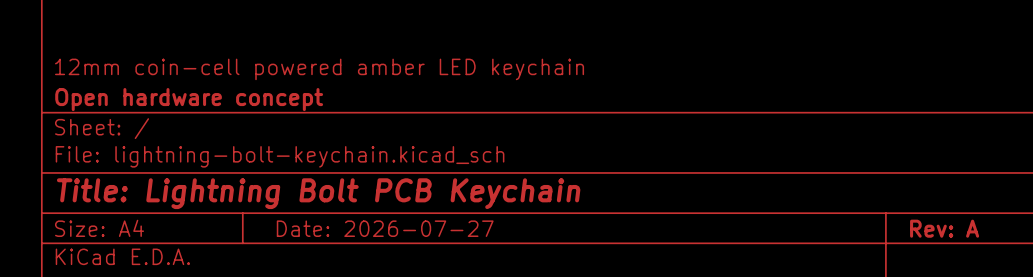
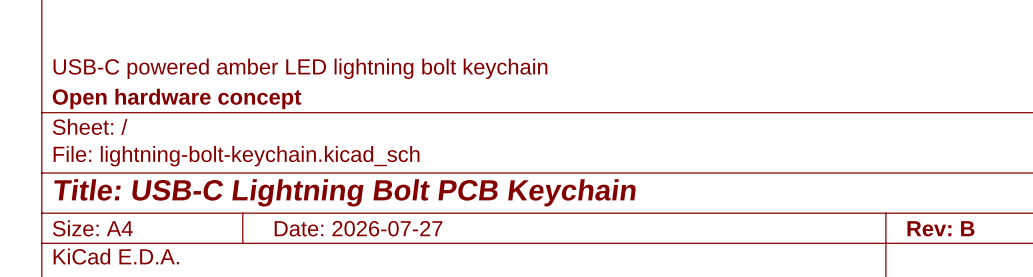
title block: 12mm coin-cell powered amber LED keychain (319, 69) -> USB-C powered amber LED lightning bolt keychain (300, 68)
title block: Title: Lightning Bolt PCB Keychain (318, 193) -> Title: USB-C Lightning Bolt PCB Keychain (345, 192)
title block: Rev: A (944, 228) -> Rev: B (940, 228)

